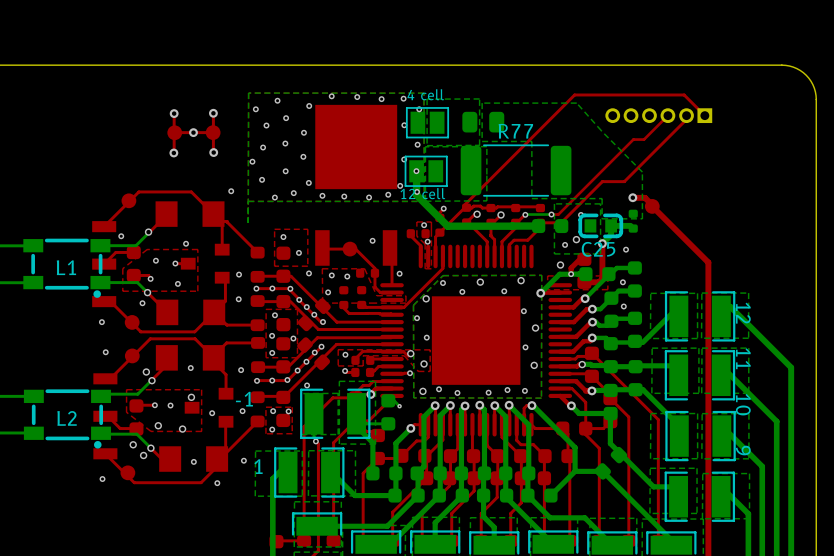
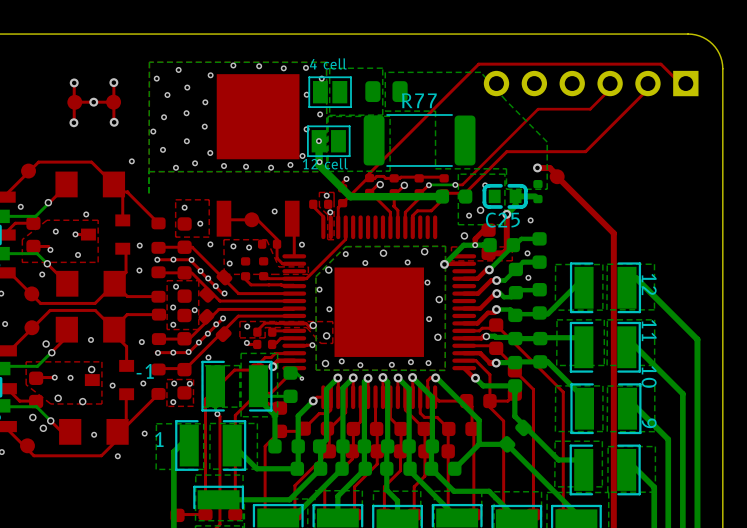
top track: (684, 94) (708, 119) -> (589, 64) (660, 64) (685, 89)
part: none -> (591, 83)
part: (658, 115) -> none
top track: (667, 115) (644, 139) -> (610, 89) (590, 109) (548, 109)
top track: (686, 115) (686, 119) (624, 181) -> (648, 89) (585, 151) (529, 151)

